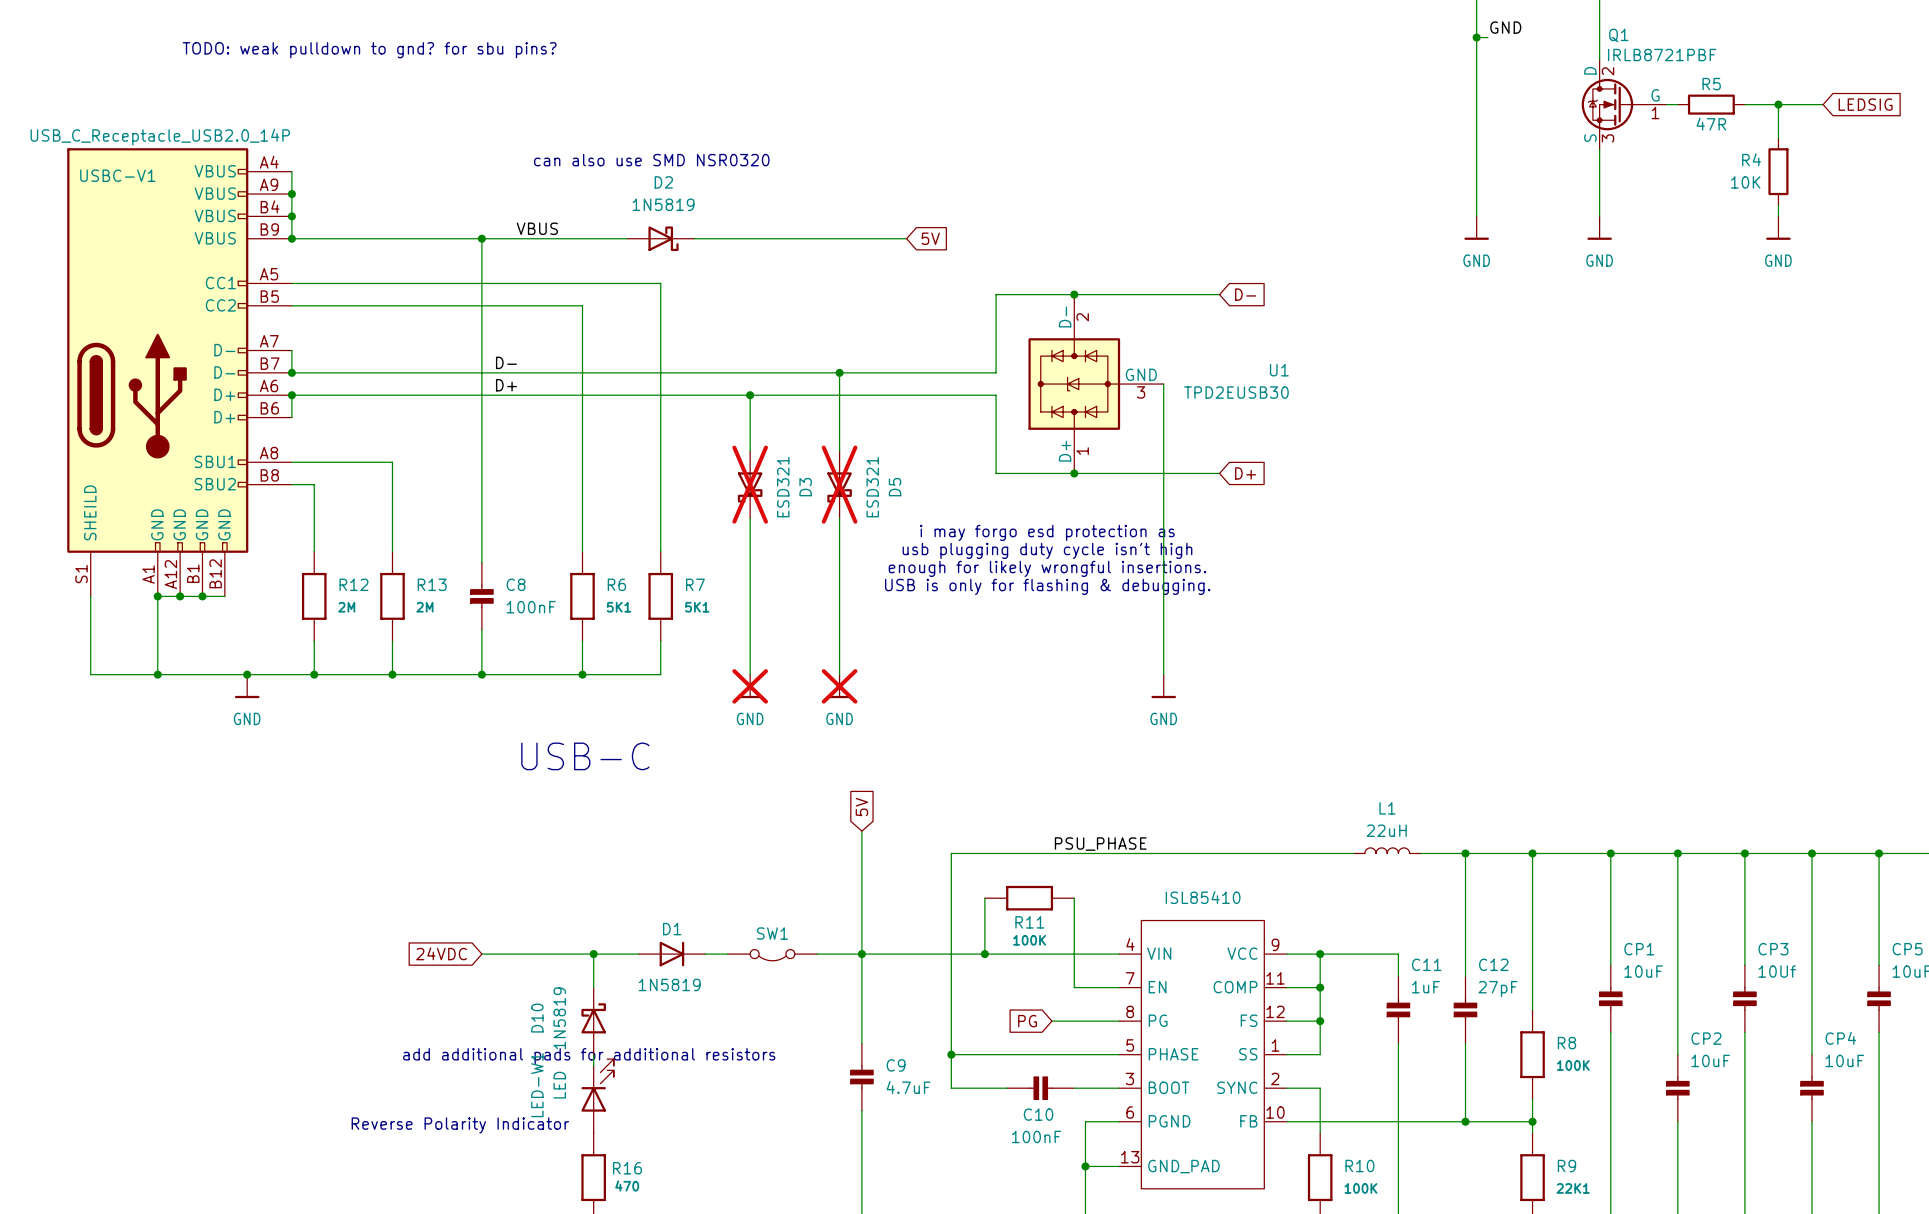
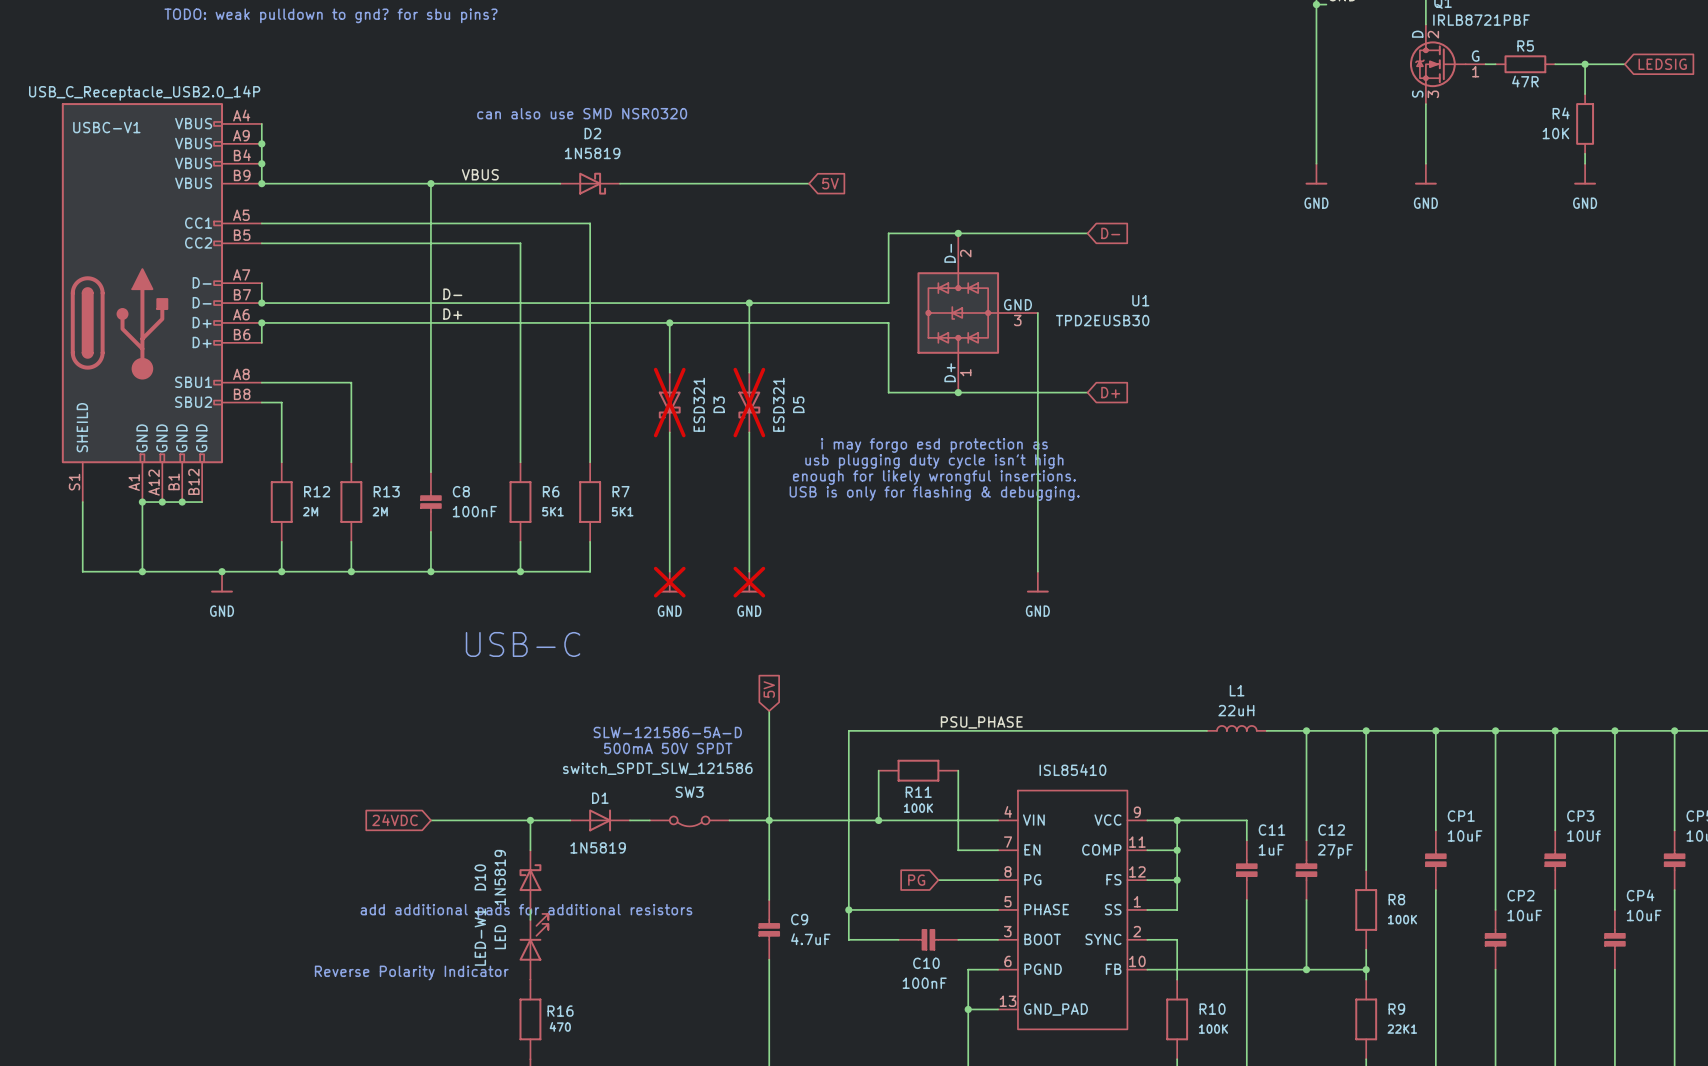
text: none -> SLW-121586-5A-D (667, 732)
text: none -> 500mA 50V SPDT (668, 748)
SW1 value: none -> switch_SPDT_SLW_121586 (657, 768)
SW1 name: SW1 (772, 933) -> SW3 (689, 792)

